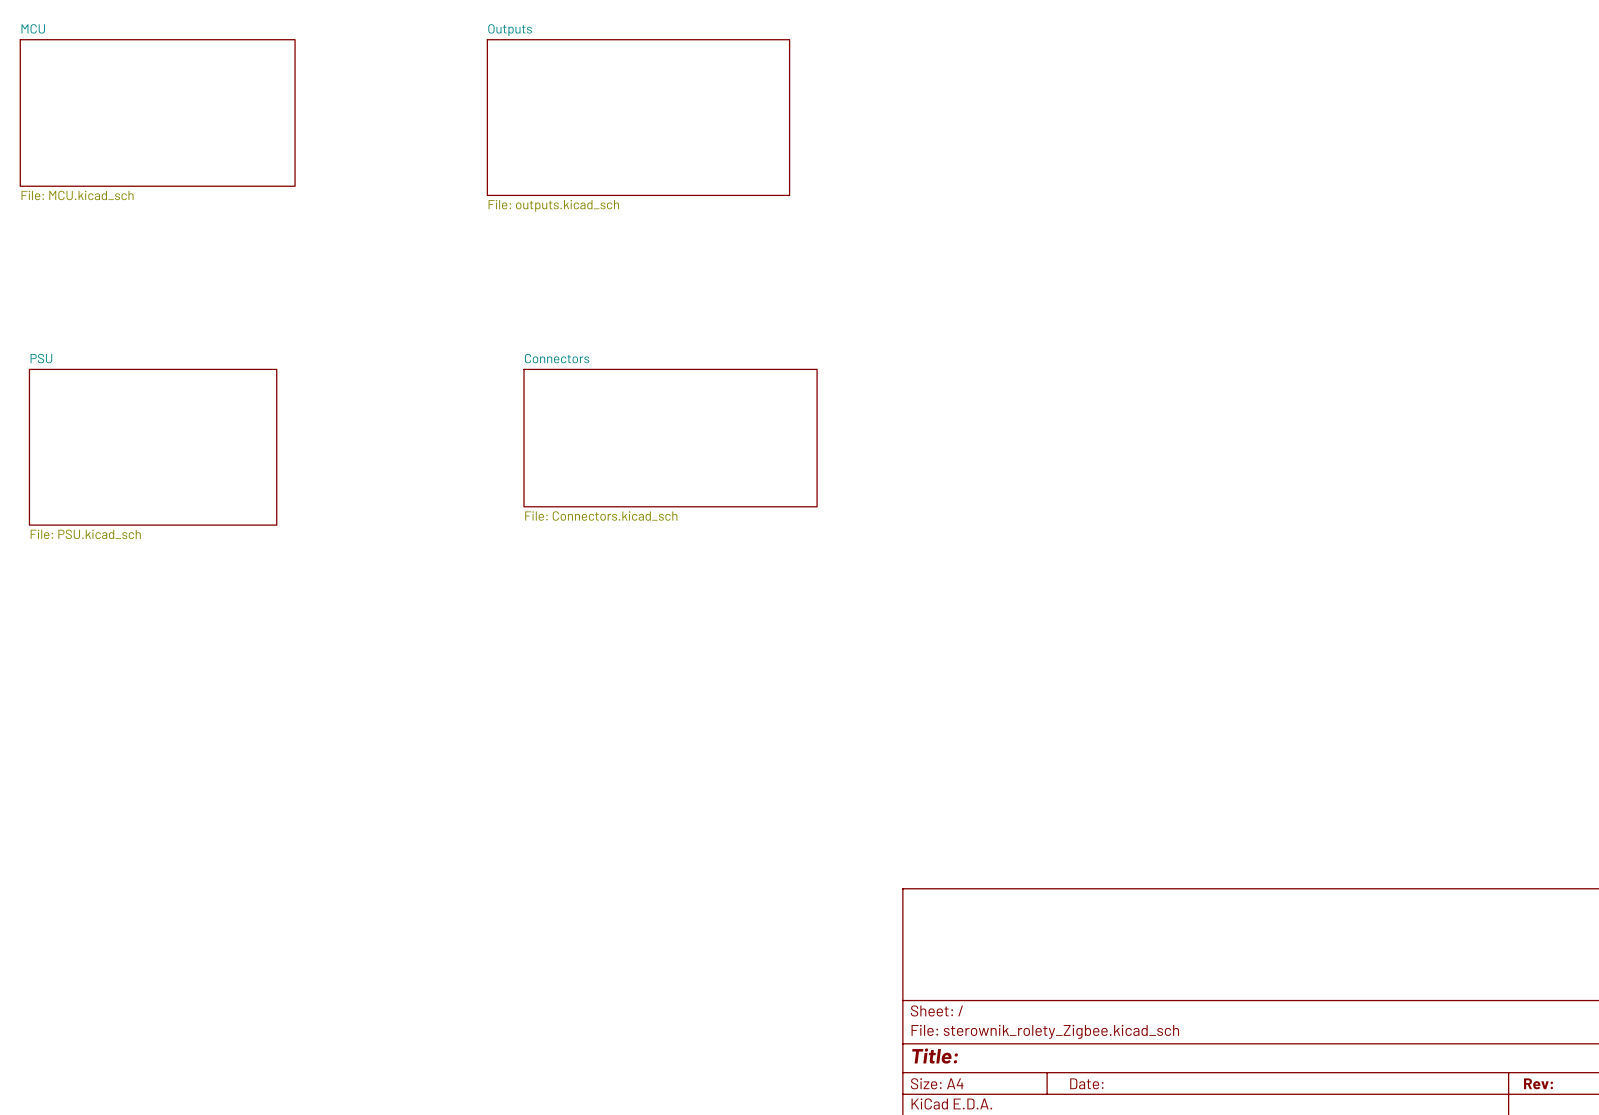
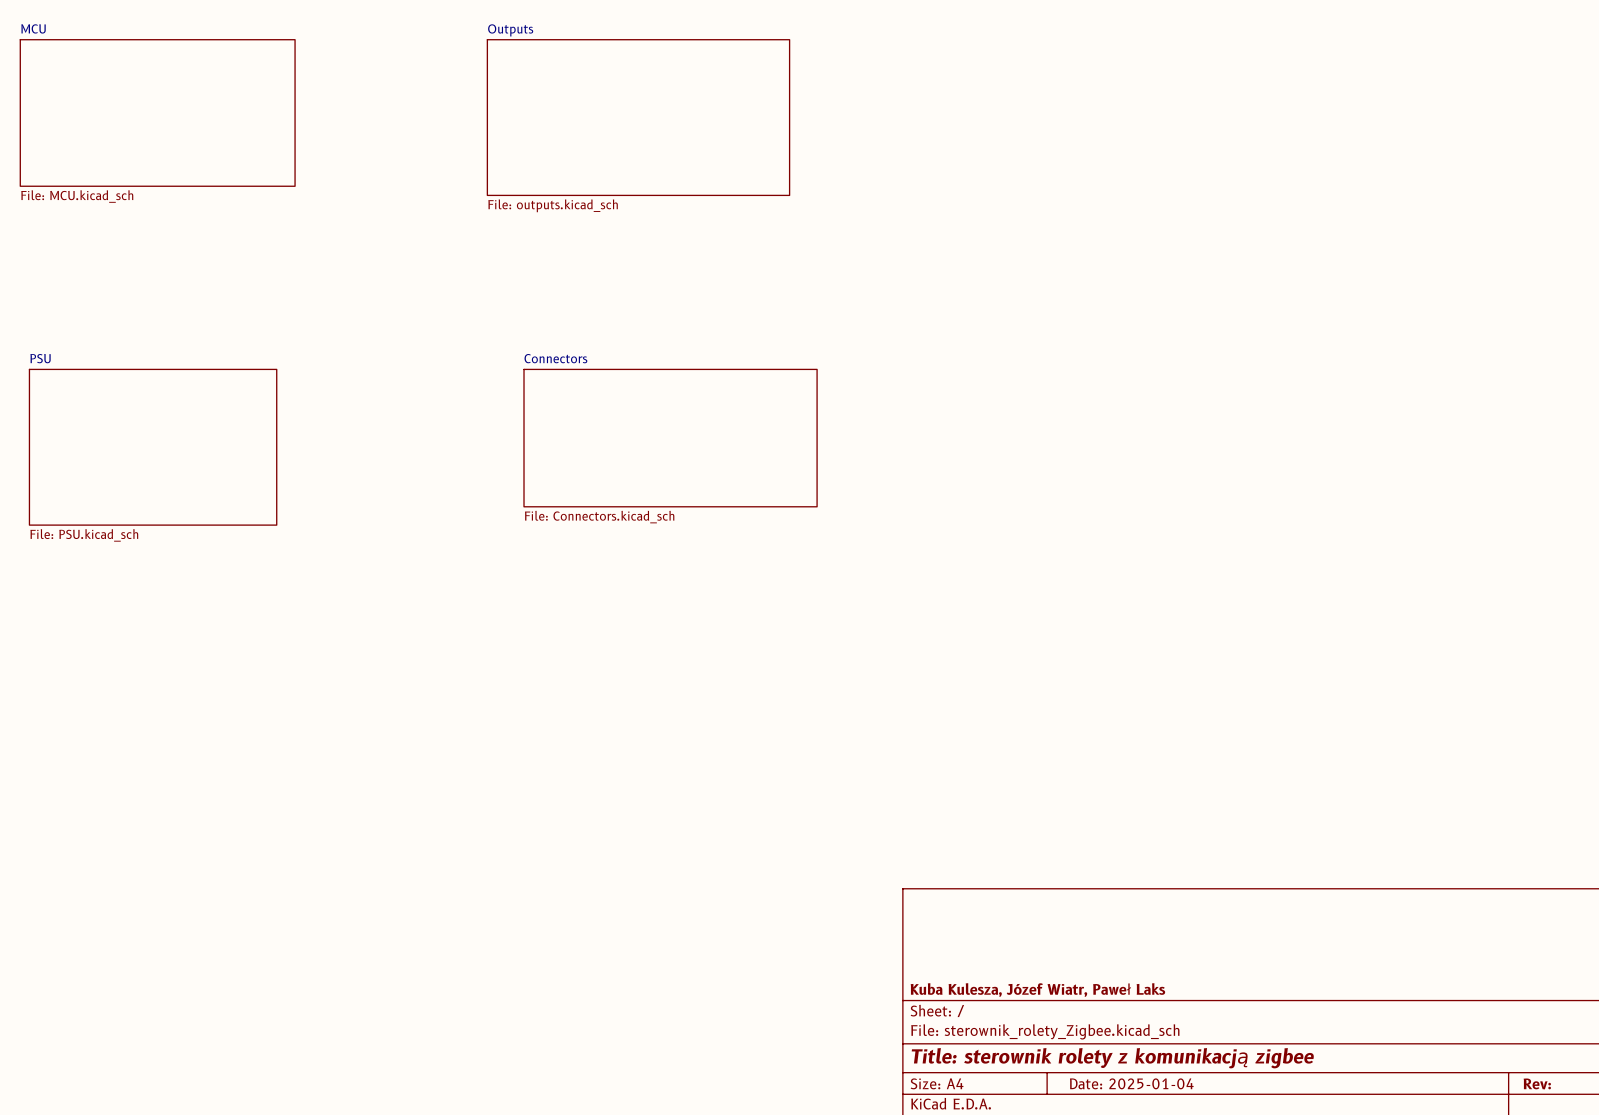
title block: none -> Kuba Kulesza, Józef Wiatr, Paweł Laks (1037, 990)
title block: Title: (935, 1056) -> Title: sterownik rolety z komunikacją zigbee (1112, 1058)
title block: Date: (1086, 1083) -> Date: 2025-01-04 (1131, 1083)

